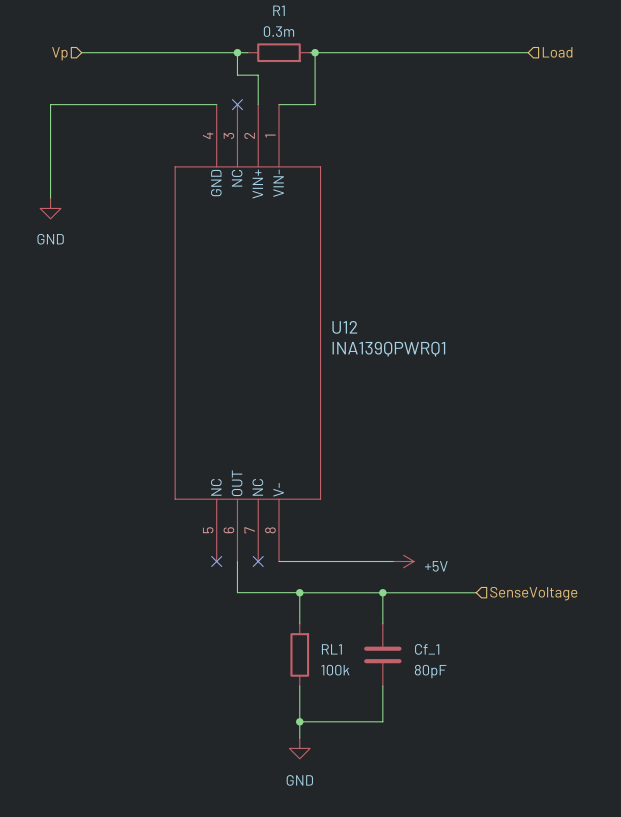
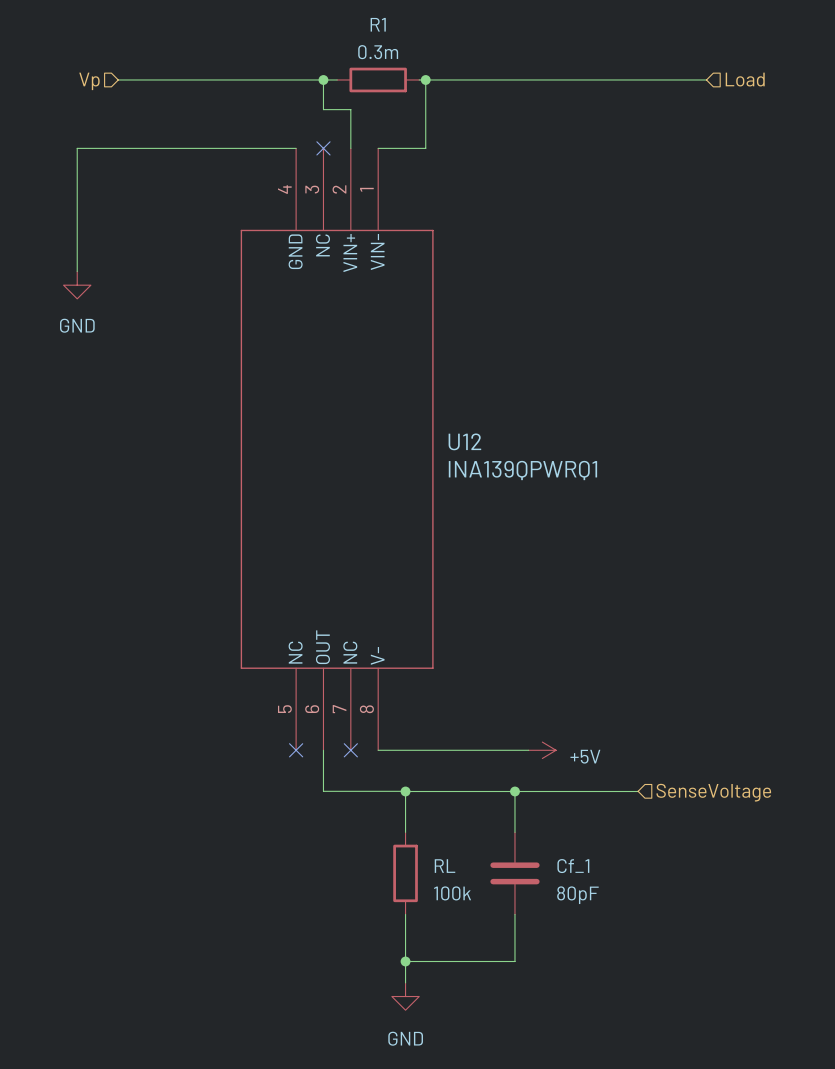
RL1 name: RL1 (331, 649) -> RL (445, 866)

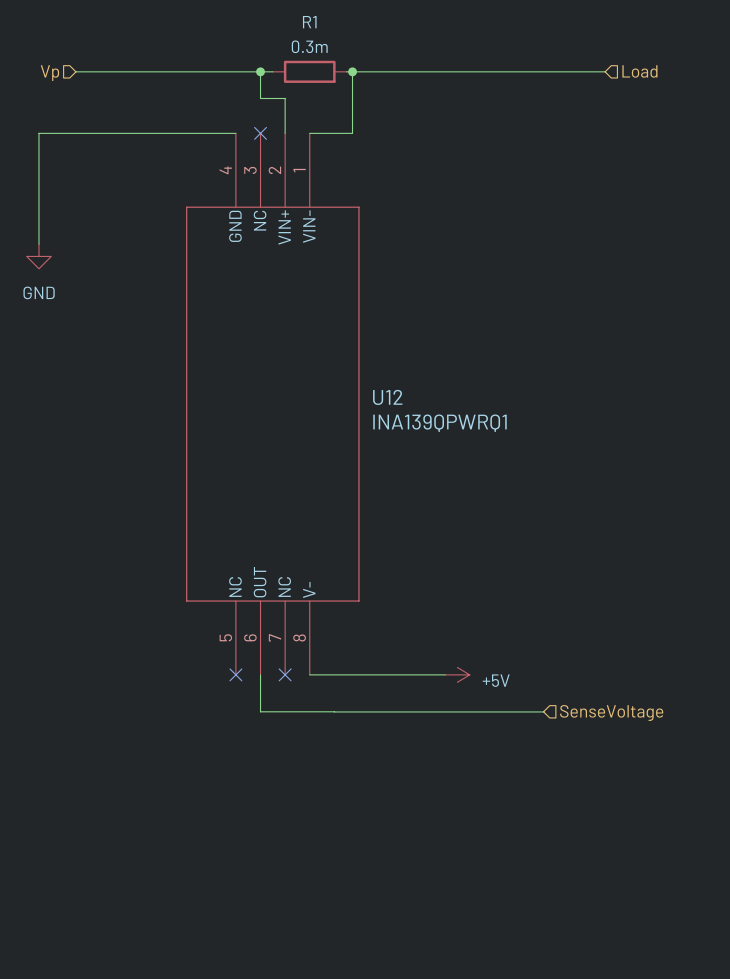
wire: (405, 791) (405, 832) -> none
junction: (405, 791) -> none
wire: (514, 791) (514, 832) -> none
junction: (514, 791) -> none
RL: 100k (405, 873) -> none
Cf_1: 80pF (514, 873) -> none
wire: (405, 914) (405, 982) -> none
wire: (514, 914) (514, 961) (405, 961) -> none
junction: (405, 961) -> none
power symbol: GND (405, 996) -> none

